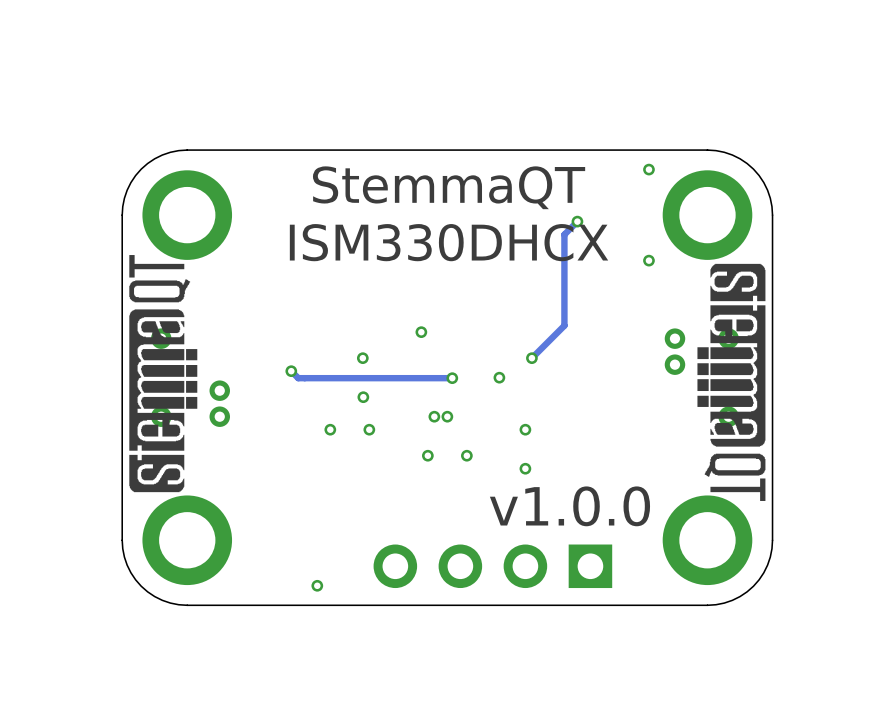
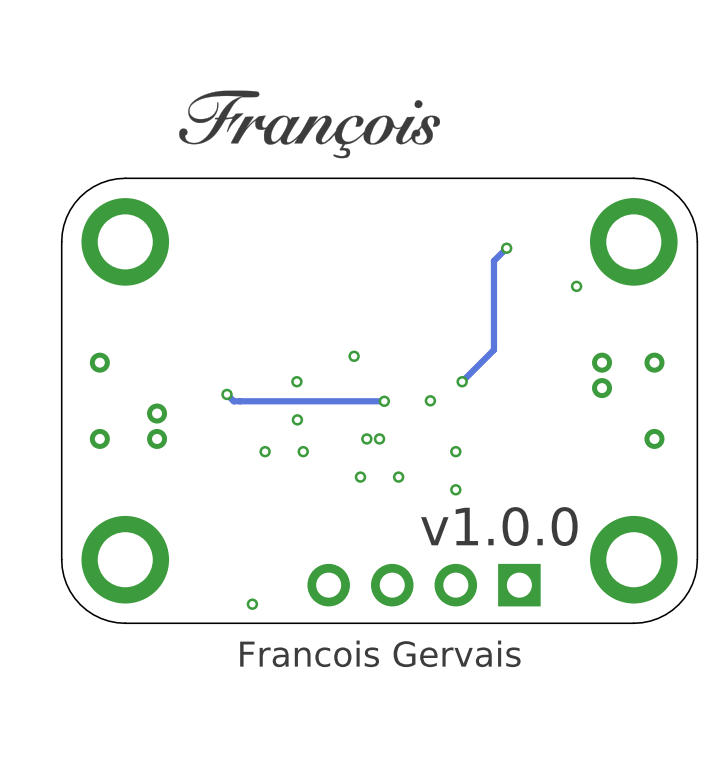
drawing: none -> [179, 90, 441, 159]
via: (648, 169) -> none
text: StemmaQT (449, 187) -> none
text: ISM330DHCX (449, 242) -> none
drawing: [129, 255, 198, 493] -> none
drawing: [697, 263, 766, 501] -> none
text: none -> Francois Gervais (380, 653)

